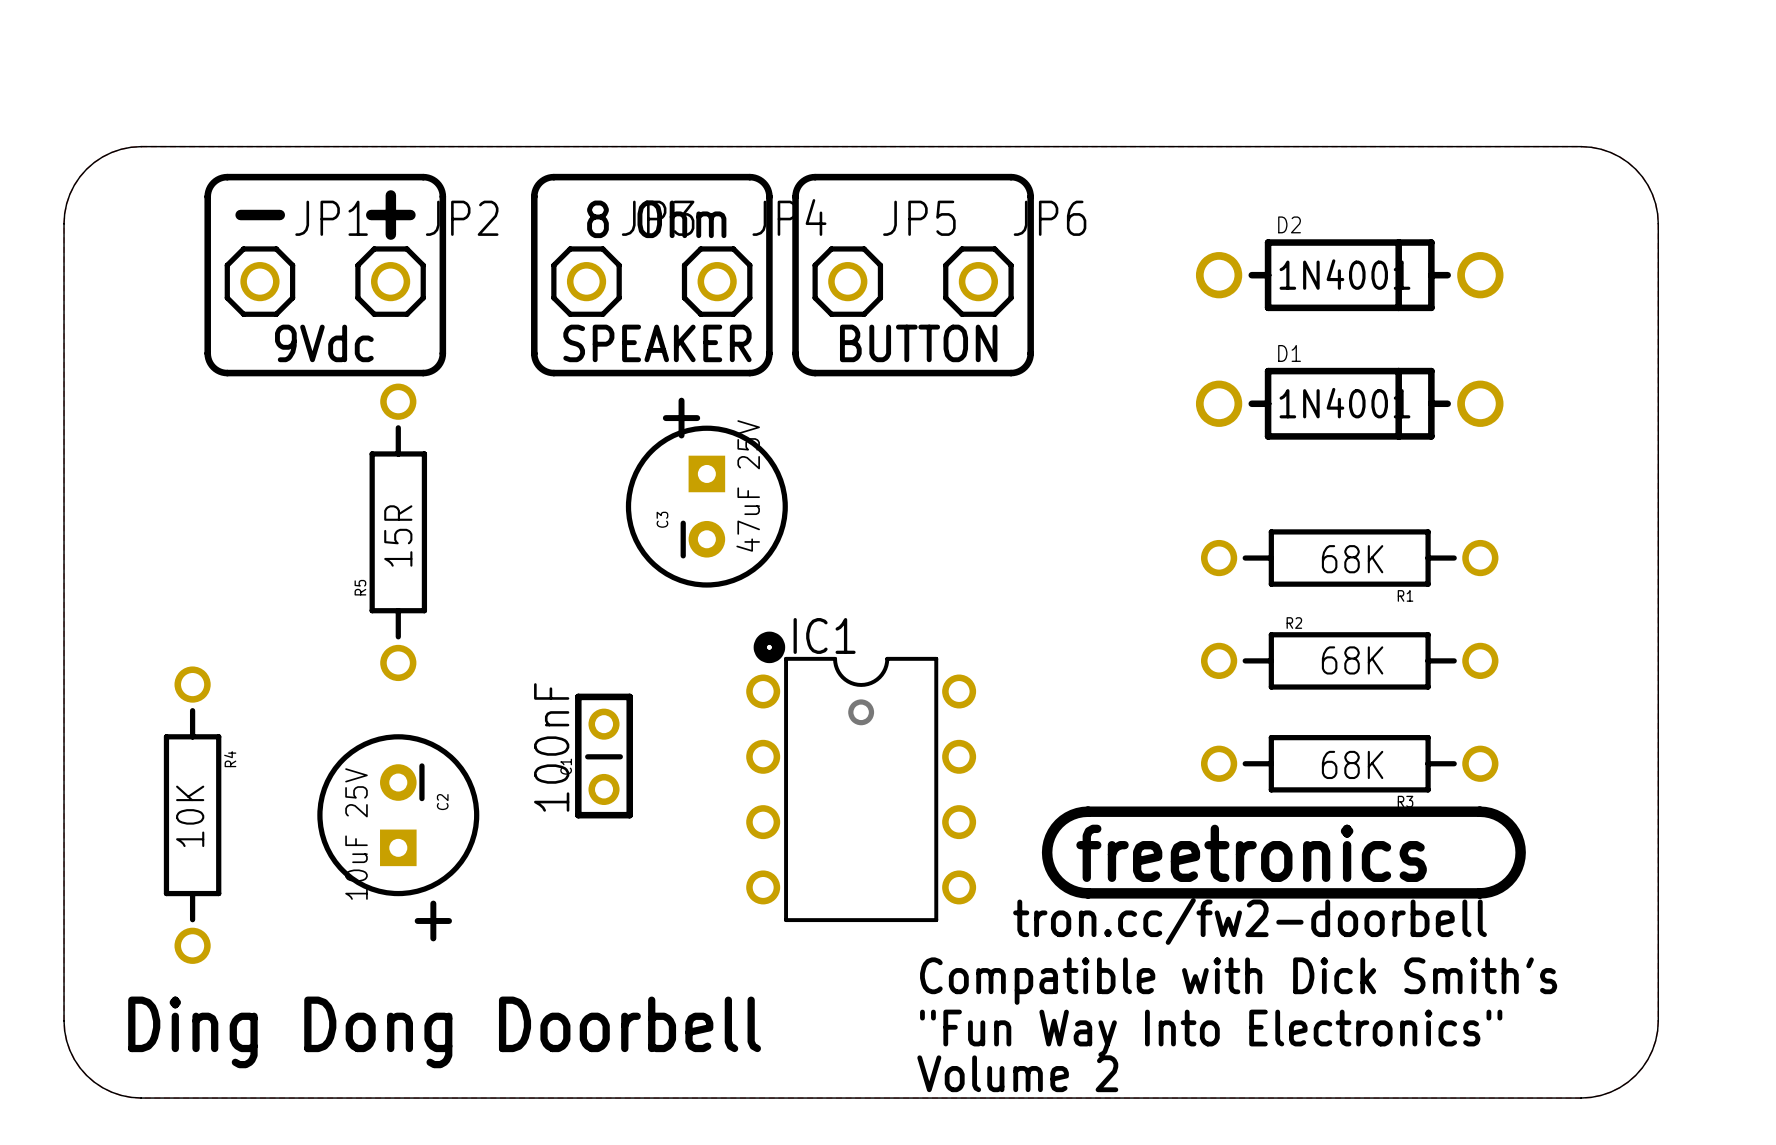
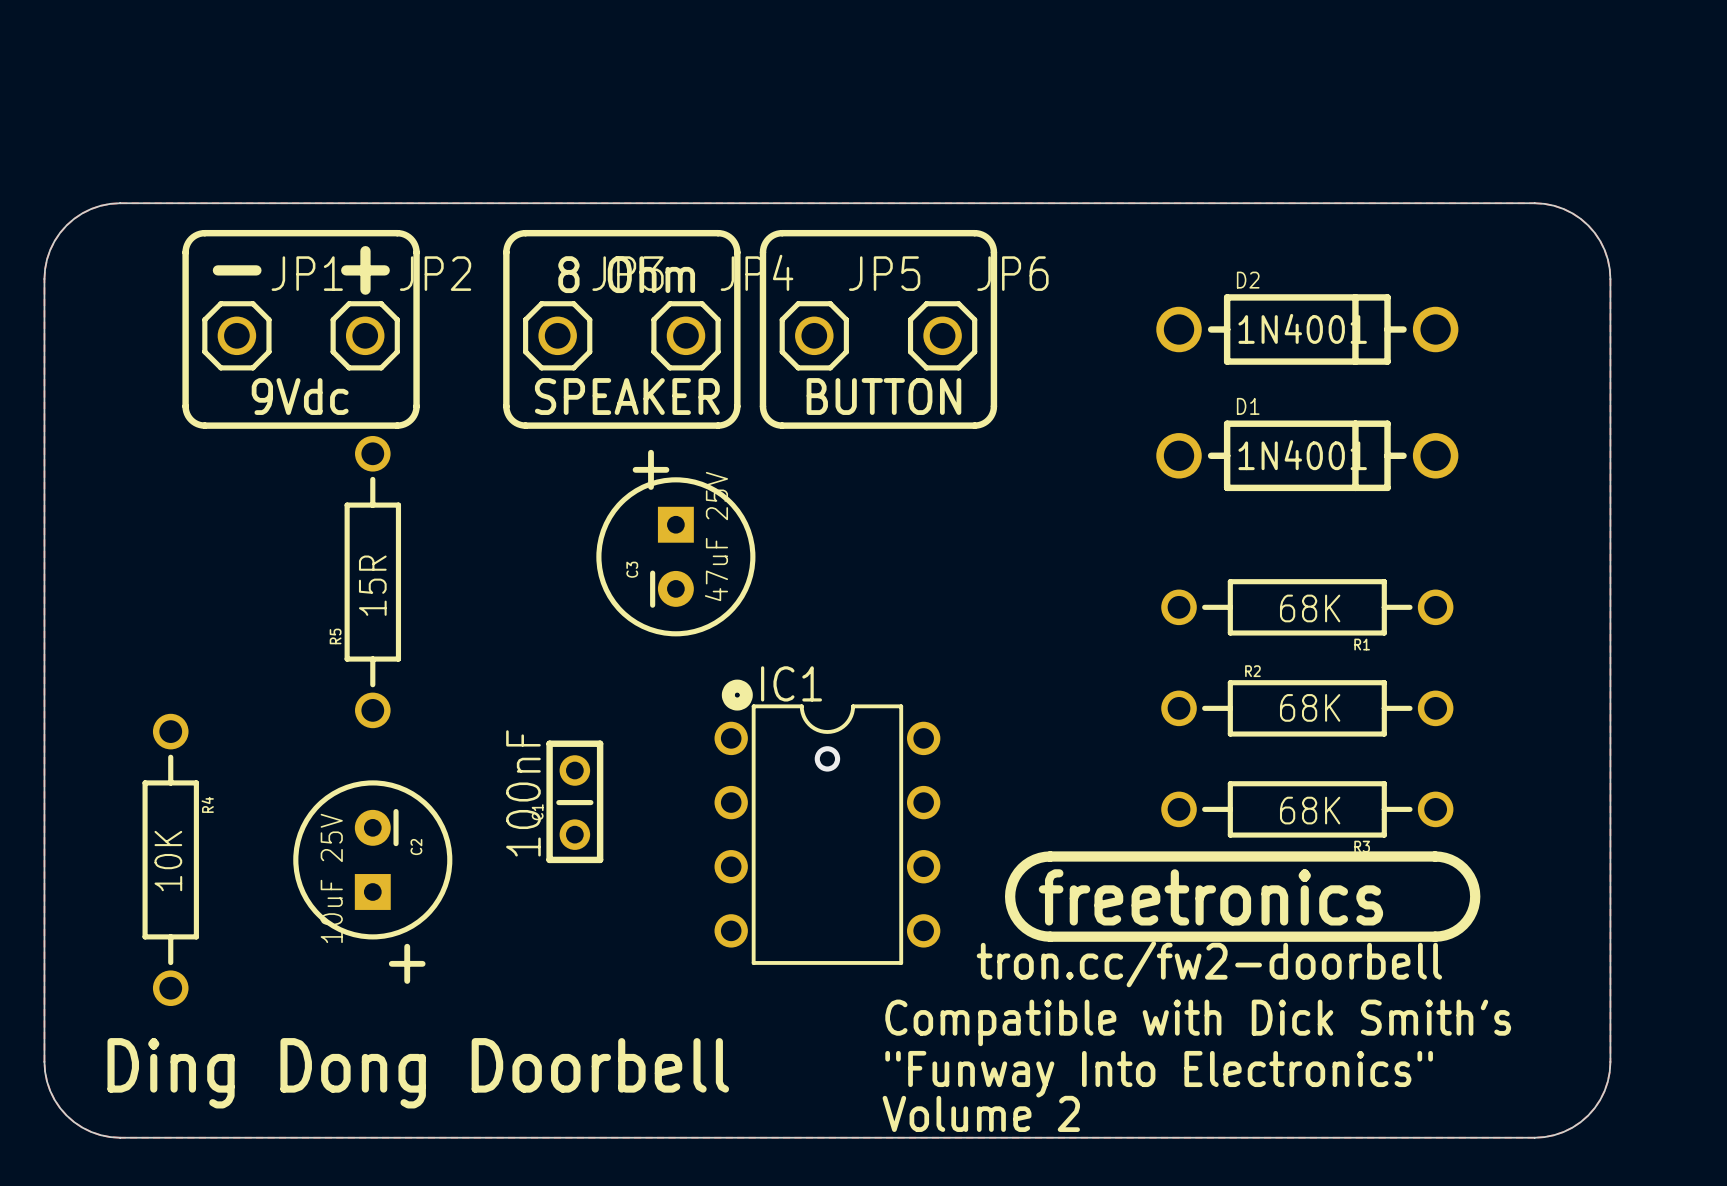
text: "Fun Way Into Electronics" (1211, 1033) -> "Funway Into Electronics" (1159, 1074)

